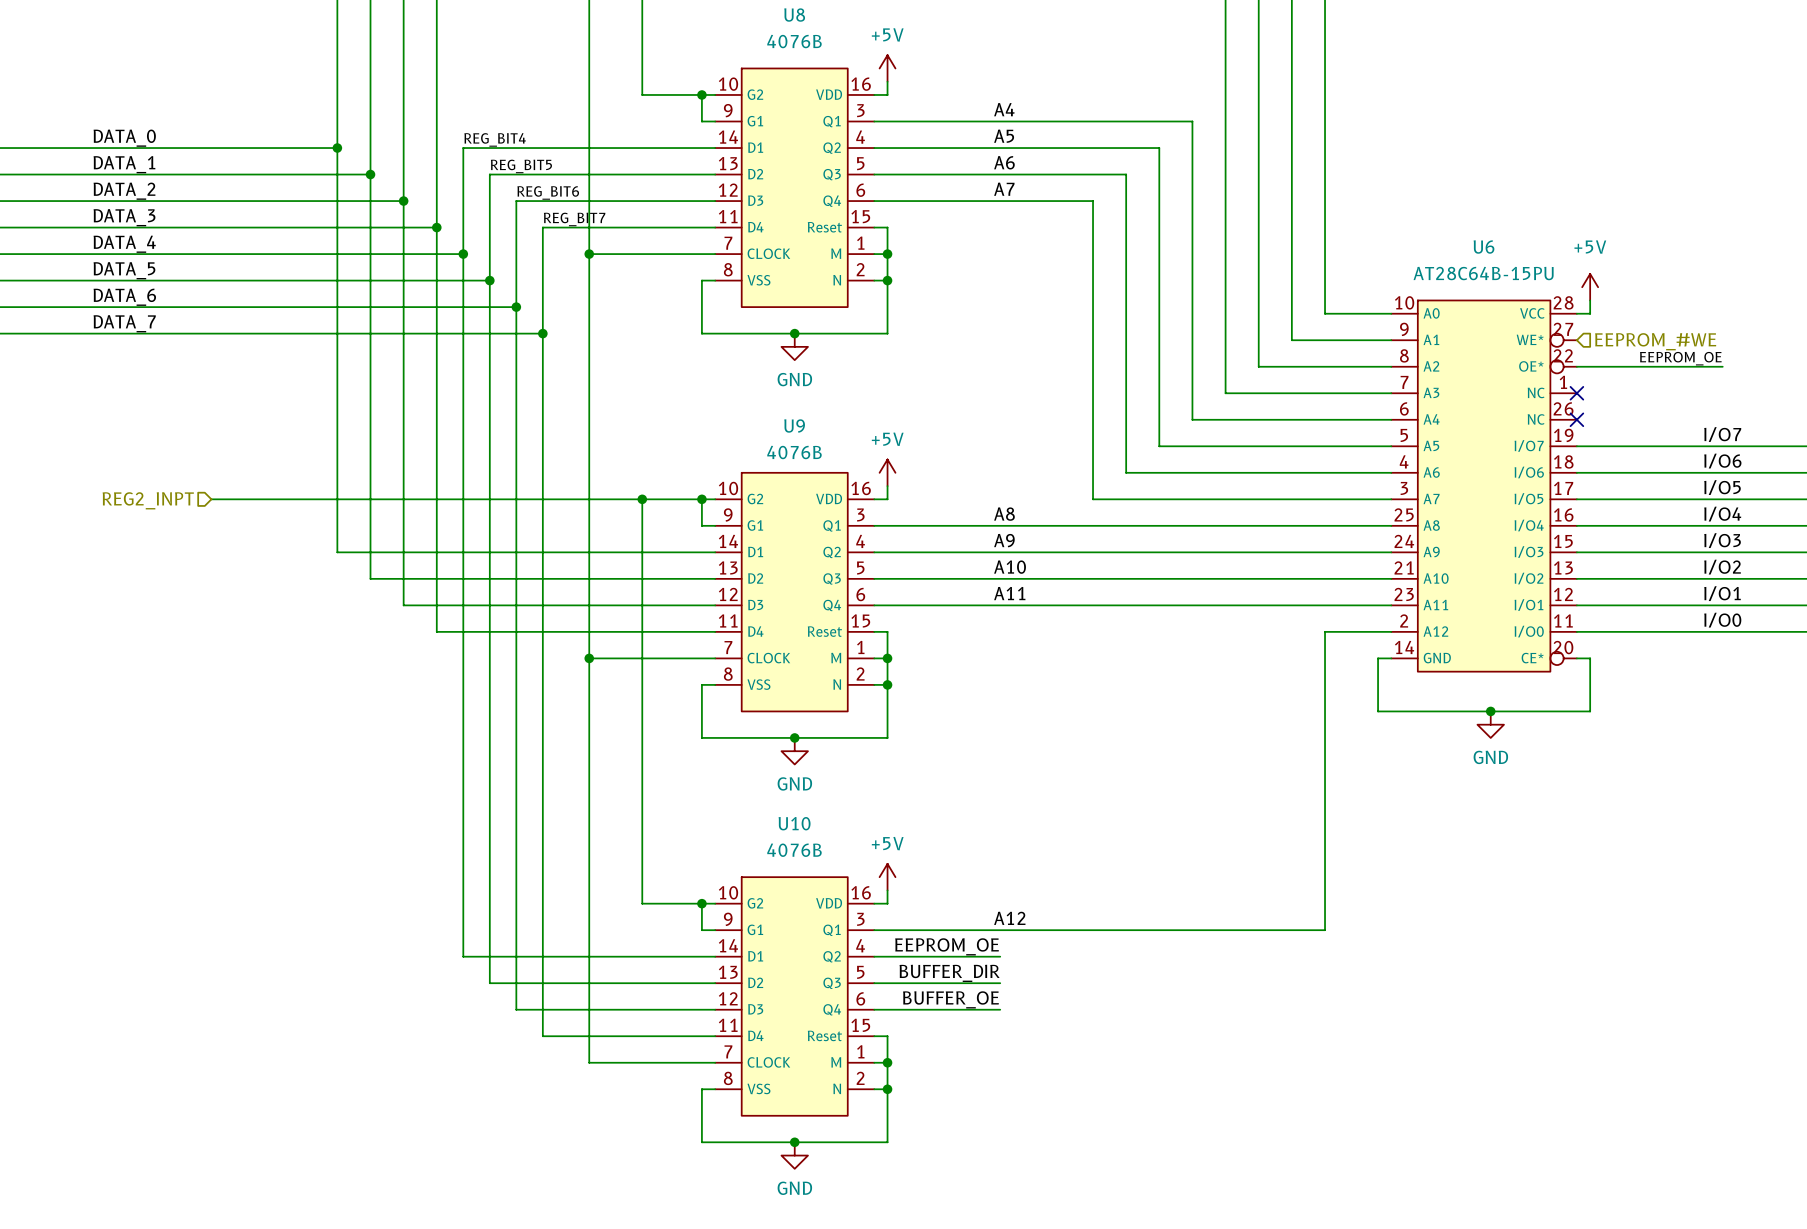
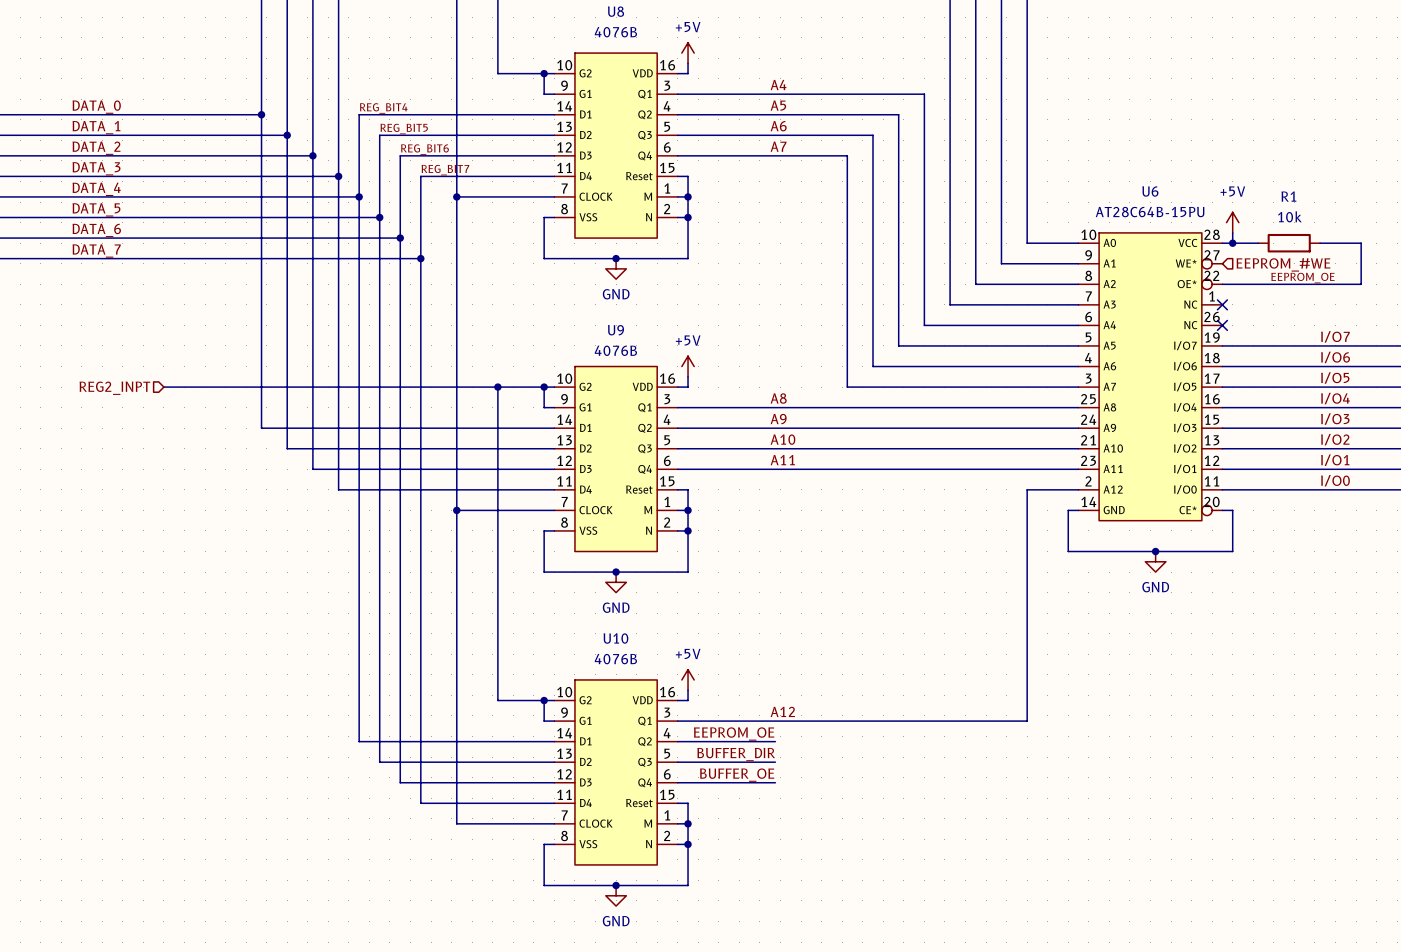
wire: none -> (1232, 243) (1258, 243)
junction: none -> (1232, 243)
R1: none -> 10k (1289, 243)
wire: none -> (1320, 243) (1361, 243) (1361, 284) (1335, 284)

